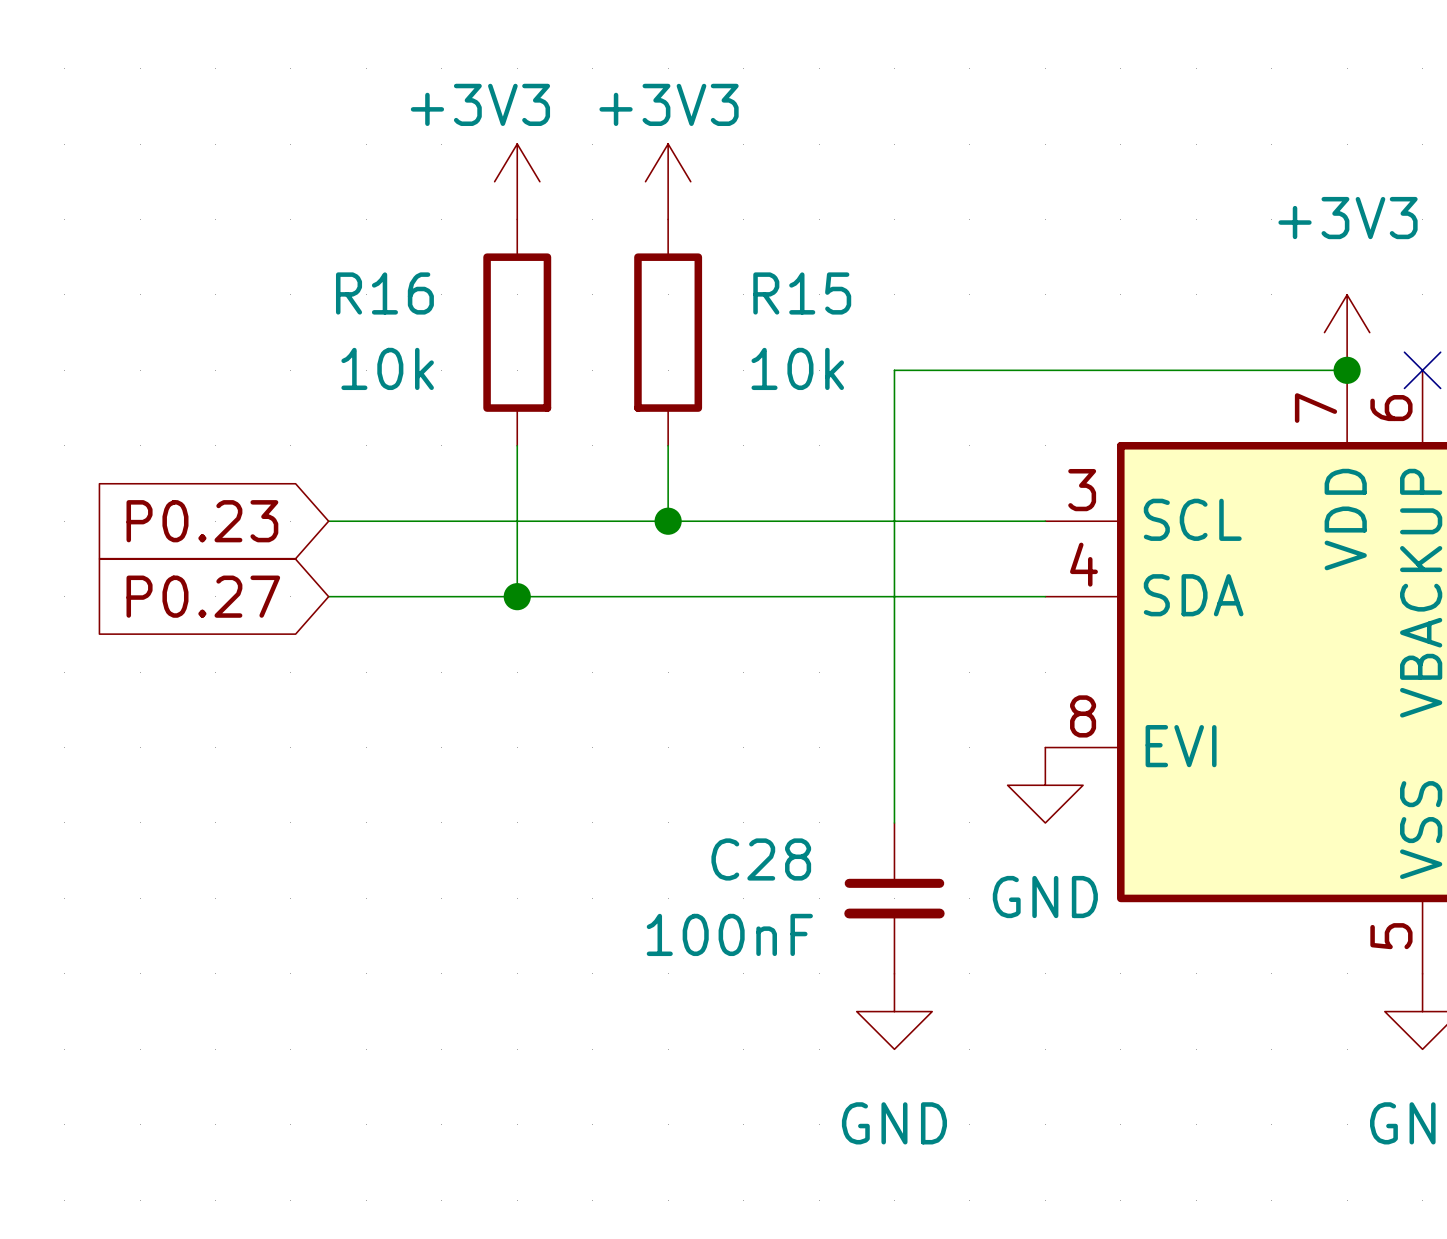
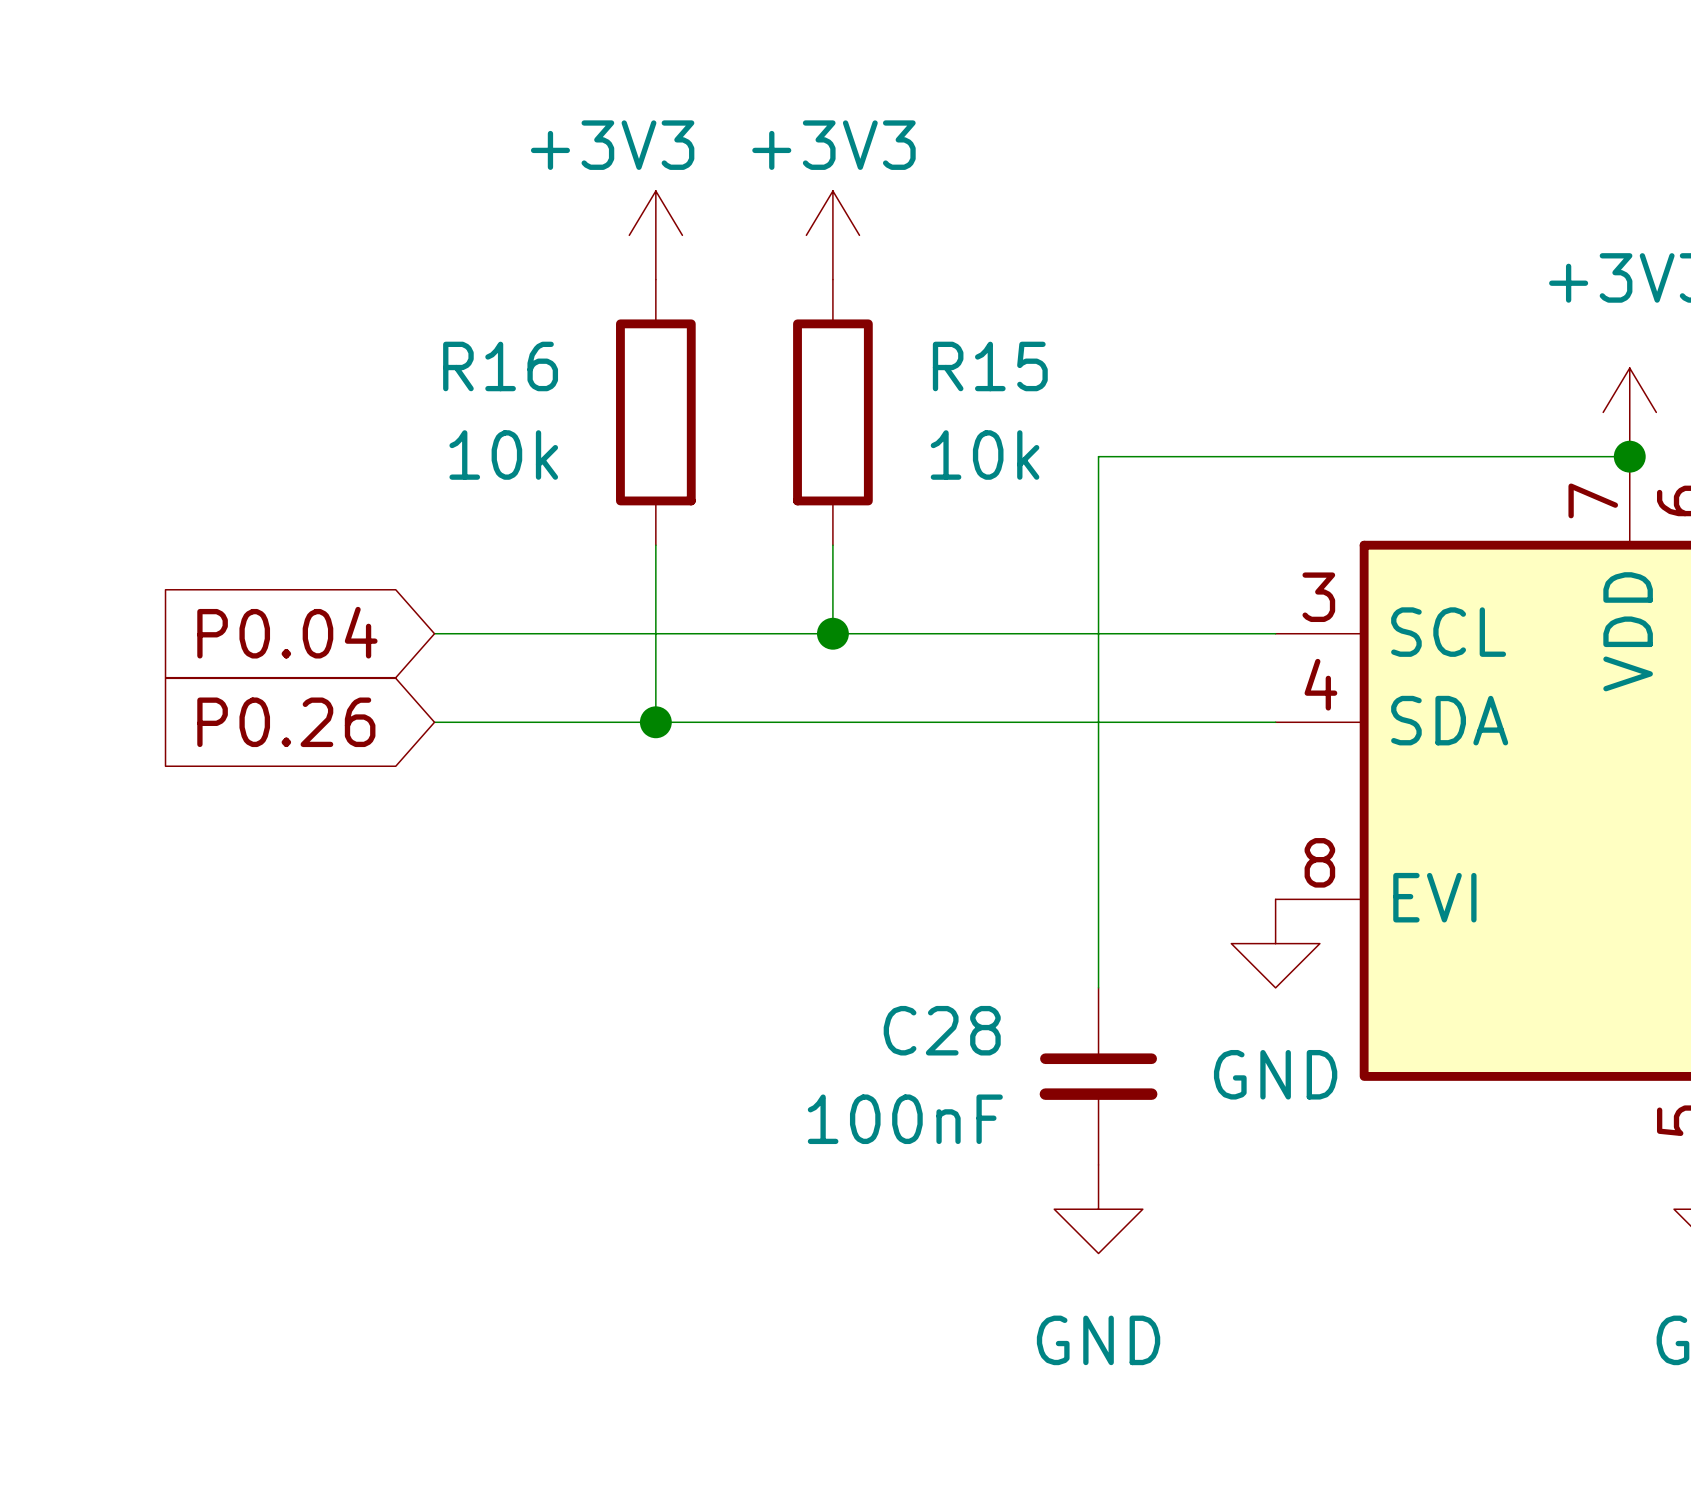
global label: P0.23 (202, 521) -> P0.04 (287, 632)
global label: P0.27 (203, 596) -> P0.26 (286, 722)

